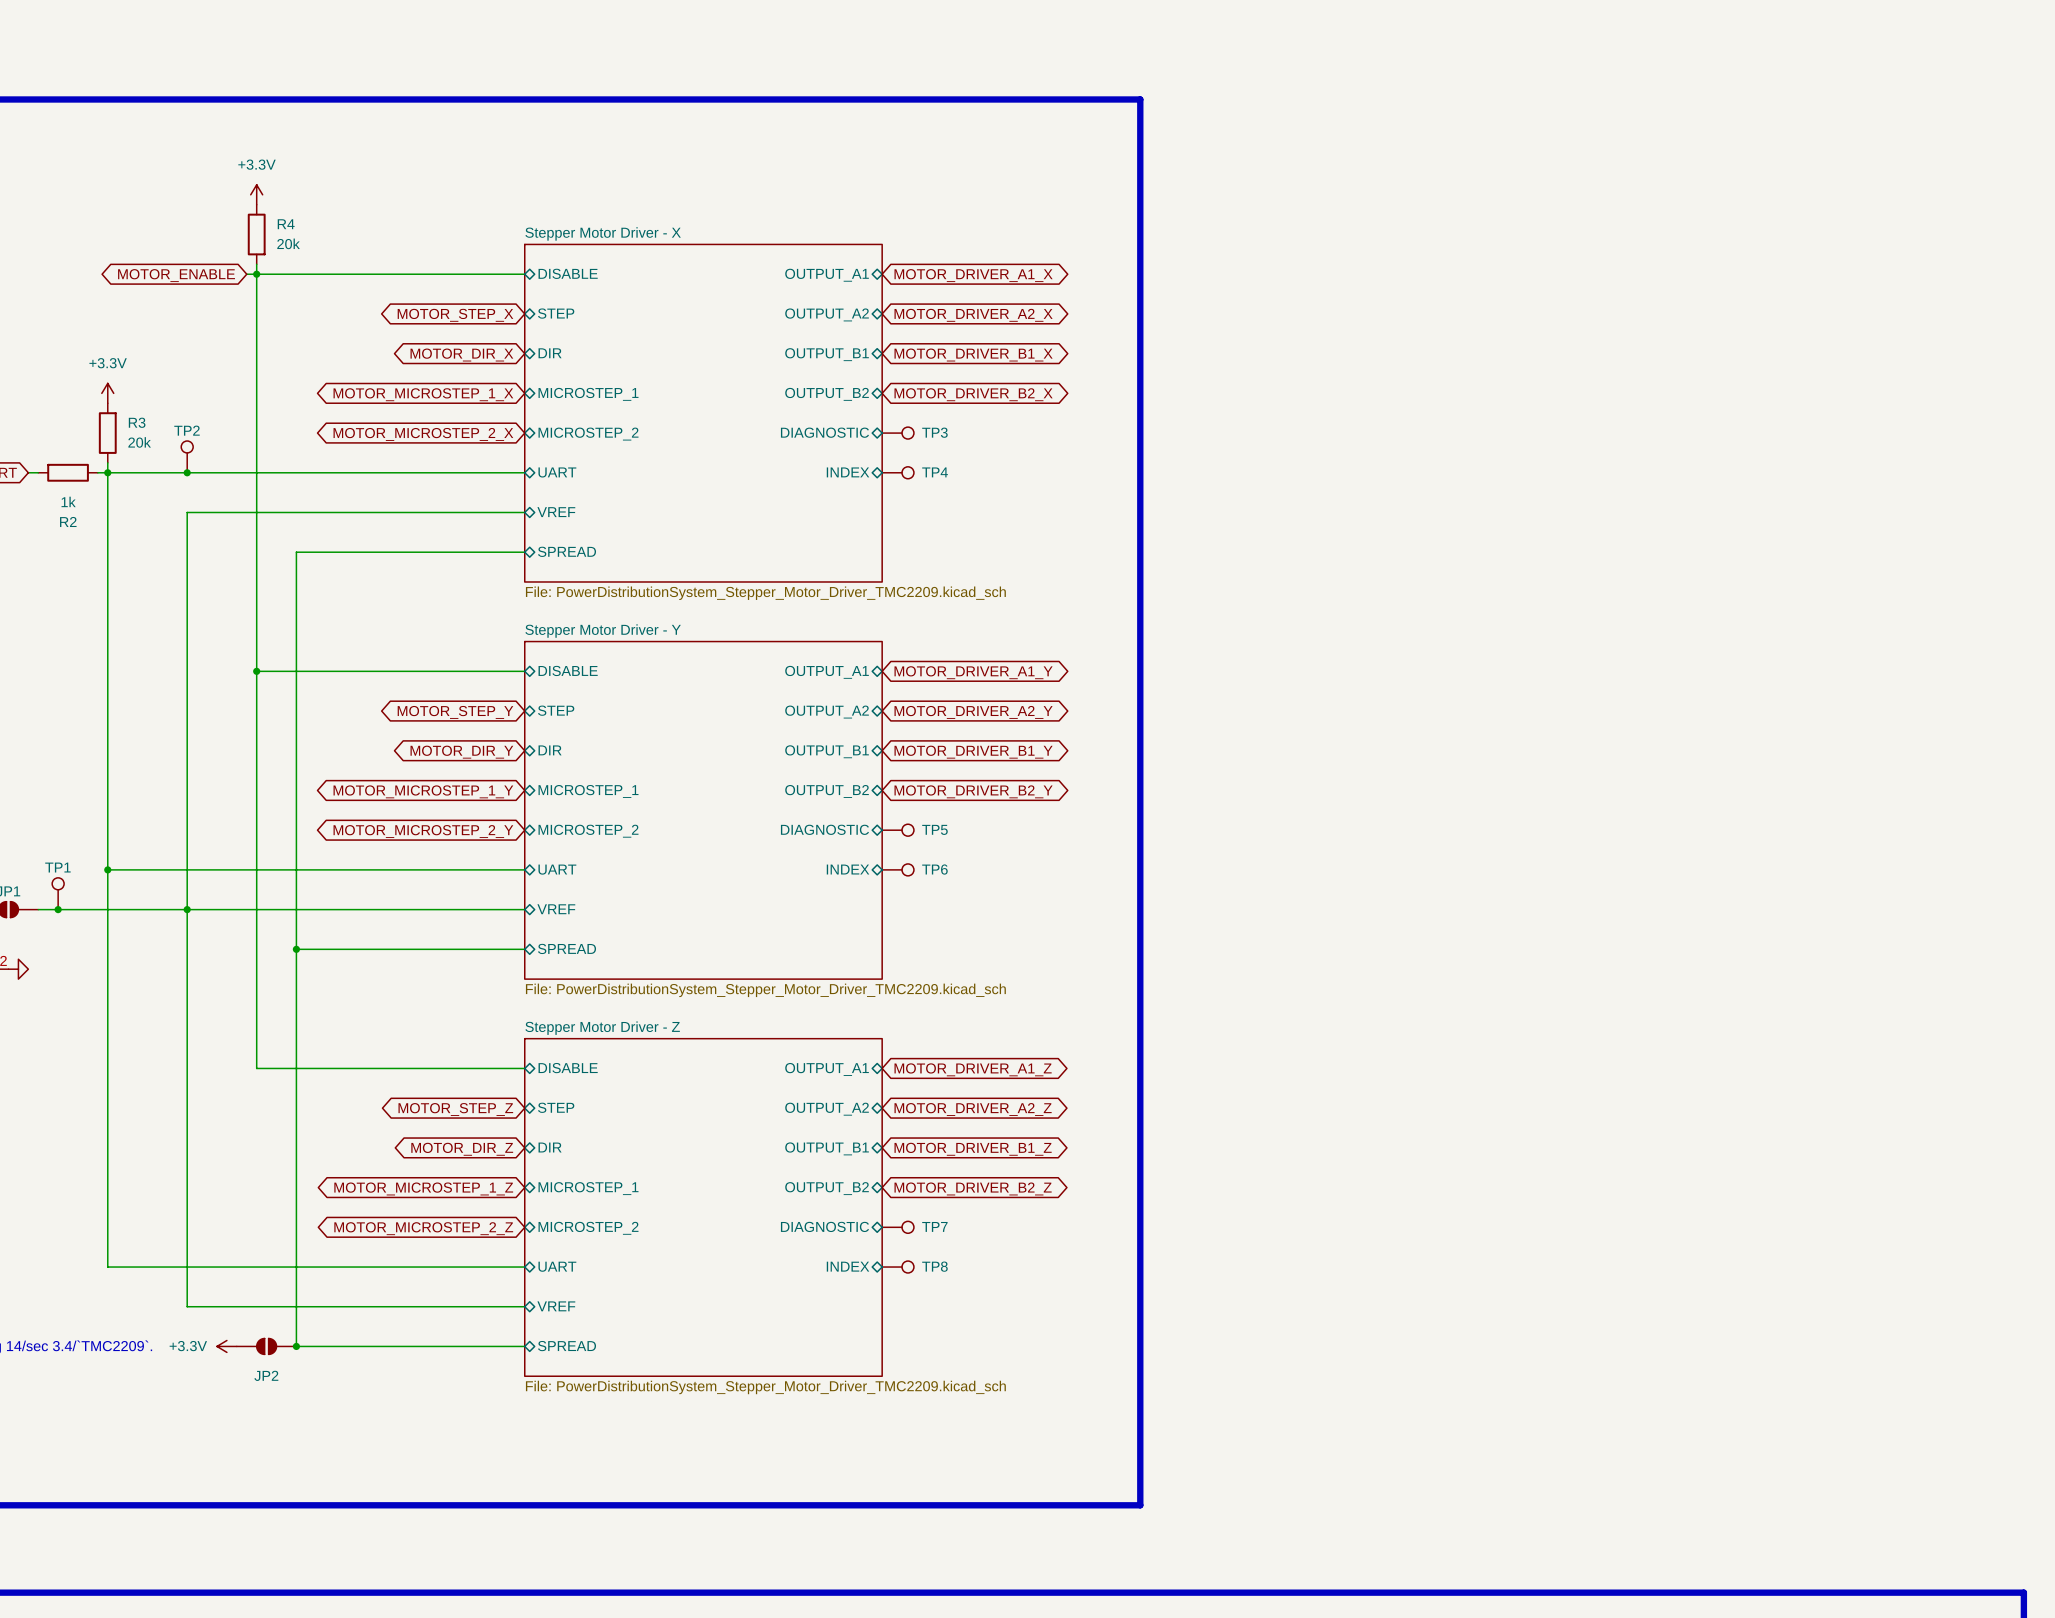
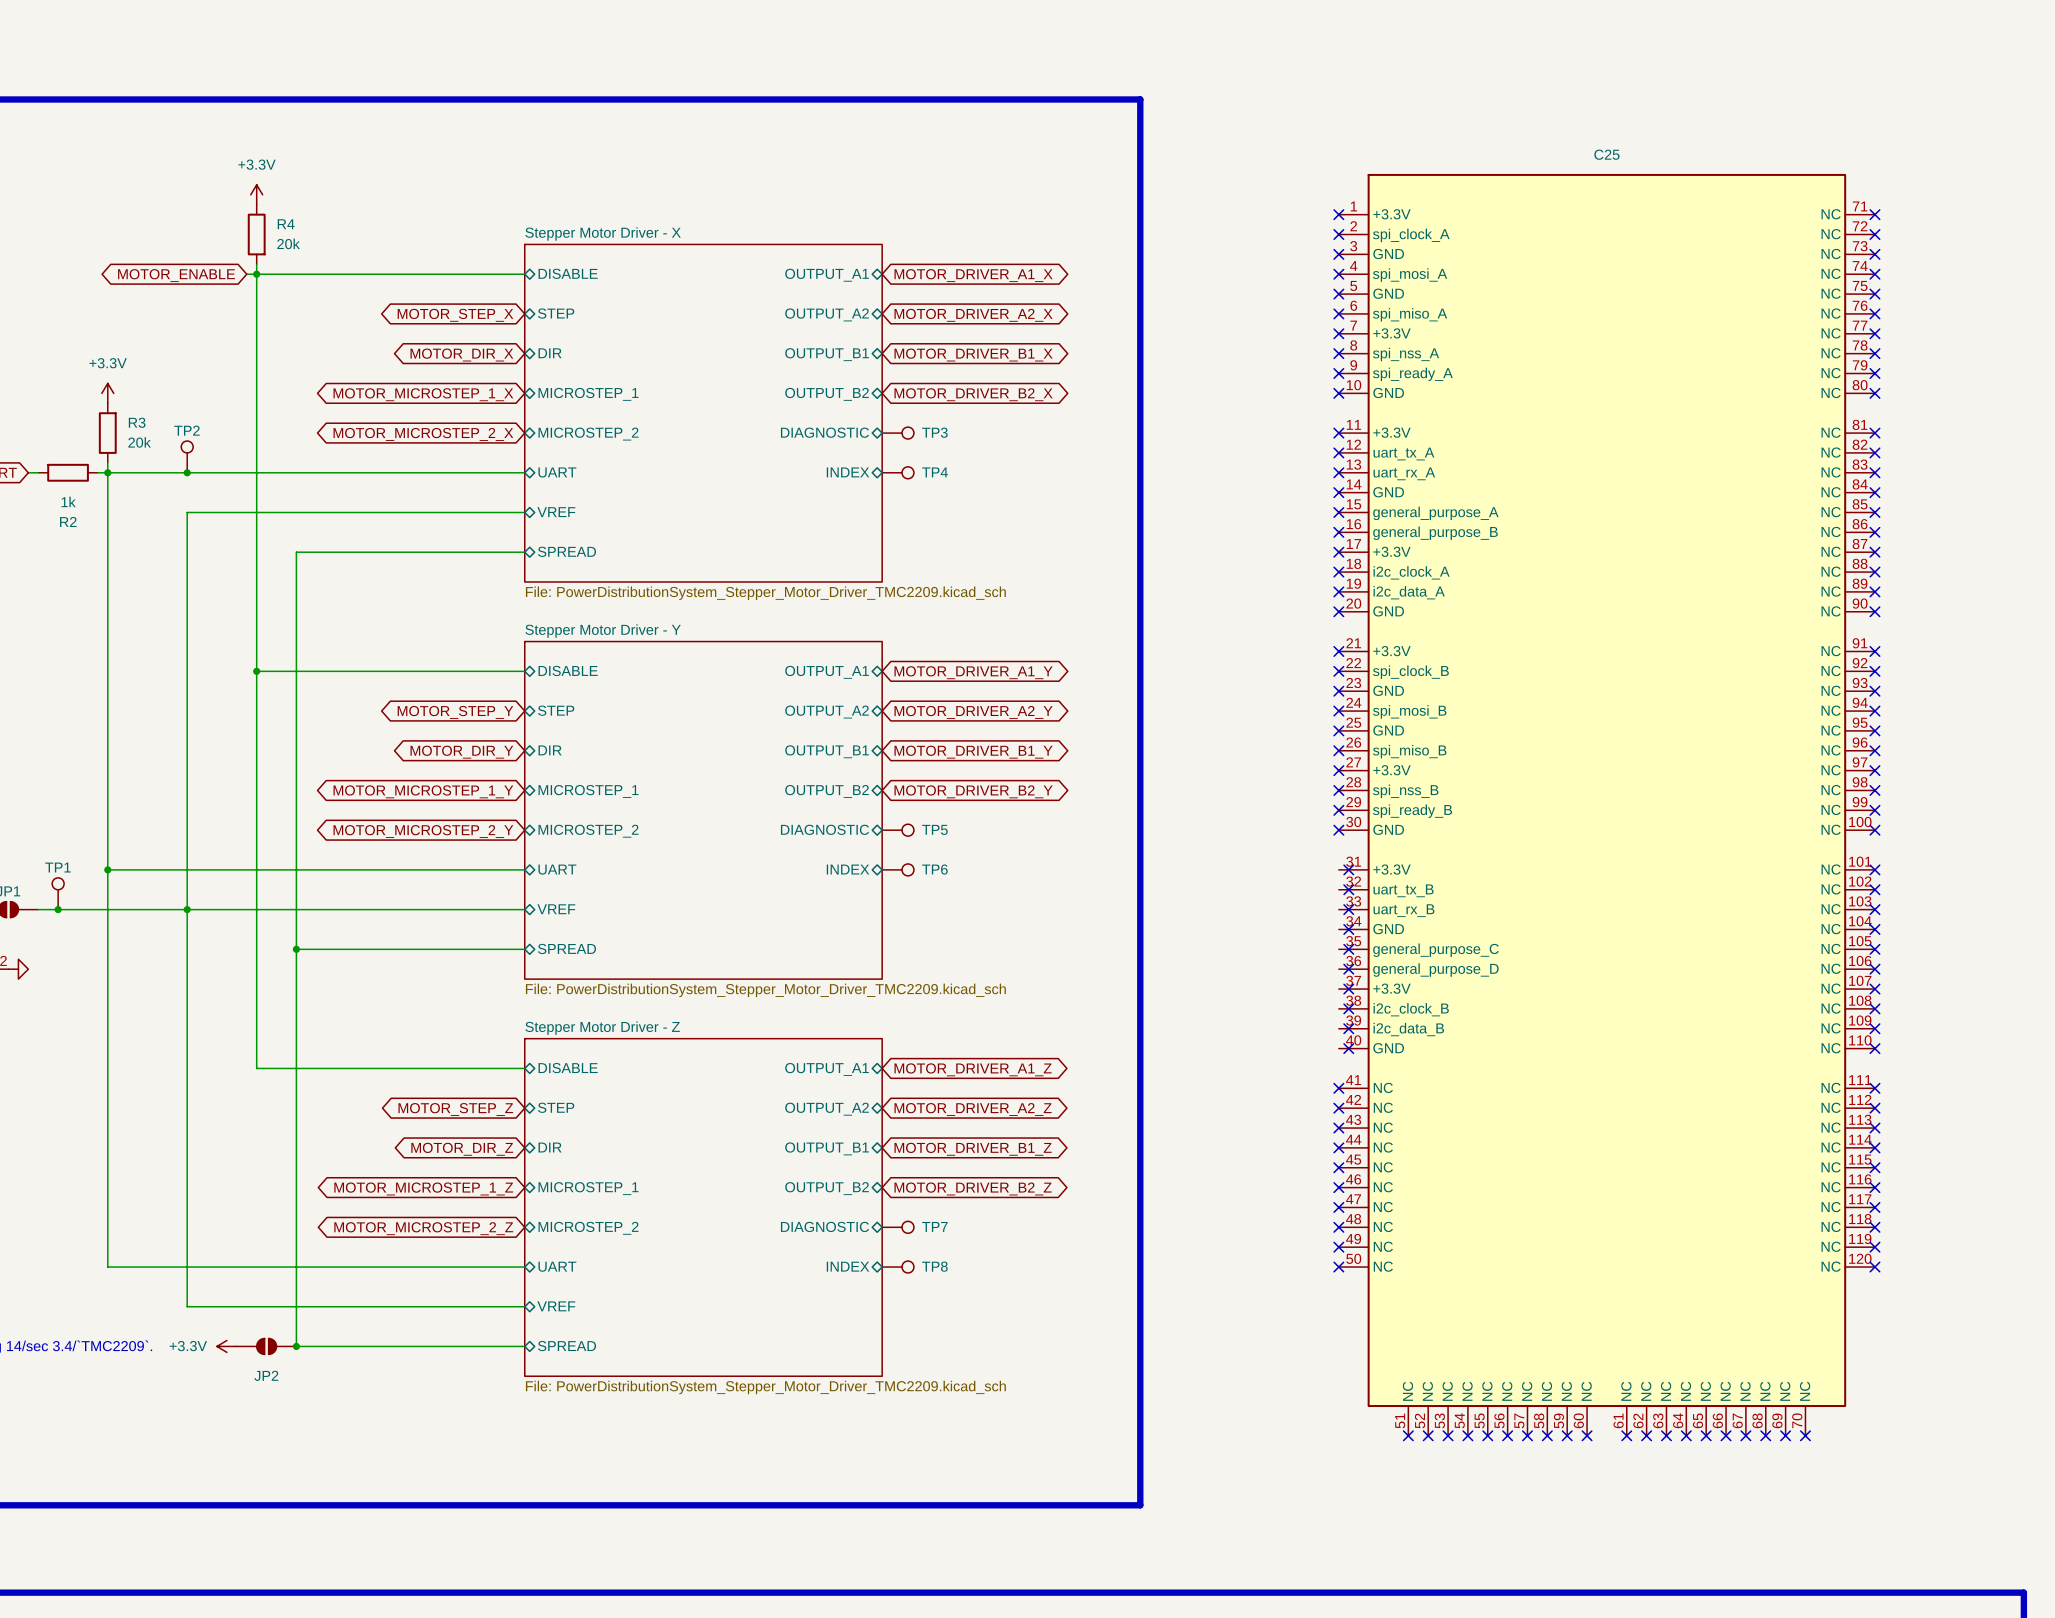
no-connect mark: none -> (1338, 214)
no-connect mark: none -> (1874, 214)
no-connect mark: none -> (1338, 234)
no-connect mark: none -> (1874, 234)
no-connect mark: none -> (1338, 254)
no-connect mark: none -> (1874, 254)
no-connect mark: none -> (1338, 274)
no-connect mark: none -> (1874, 274)
no-connect mark: none -> (1338, 294)
no-connect mark: none -> (1874, 294)
no-connect mark: none -> (1338, 313)
no-connect mark: none -> (1874, 313)
no-connect mark: none -> (1338, 333)
no-connect mark: none -> (1874, 333)
no-connect mark: none -> (1338, 353)
no-connect mark: none -> (1874, 353)
no-connect mark: none -> (1338, 373)
no-connect mark: none -> (1874, 373)
no-connect mark: none -> (1338, 393)
no-connect mark: none -> (1874, 393)
no-connect mark: none -> (1338, 433)
no-connect mark: none -> (1874, 433)
no-connect mark: none -> (1338, 452)
no-connect mark: none -> (1874, 452)
no-connect mark: none -> (1338, 472)
no-connect mark: none -> (1874, 472)
no-connect mark: none -> (1338, 492)
no-connect mark: none -> (1874, 492)
no-connect mark: none -> (1338, 512)
no-connect mark: none -> (1874, 512)
no-connect mark: none -> (1338, 532)
no-connect mark: none -> (1874, 532)
no-connect mark: none -> (1338, 552)
no-connect mark: none -> (1874, 552)
no-connect mark: none -> (1338, 572)
no-connect mark: none -> (1874, 572)
no-connect mark: none -> (1338, 591)
no-connect mark: none -> (1874, 591)
no-connect mark: none -> (1338, 611)
no-connect mark: none -> (1874, 611)
no-connect mark: none -> (1338, 651)
no-connect mark: none -> (1874, 651)
no-connect mark: none -> (1338, 671)
no-connect mark: none -> (1874, 671)
no-connect mark: none -> (1338, 691)
no-connect mark: none -> (1874, 691)
no-connect mark: none -> (1338, 711)
no-connect mark: none -> (1874, 711)
no-connect mark: none -> (1338, 730)
no-connect mark: none -> (1874, 730)
no-connect mark: none -> (1338, 750)
no-connect mark: none -> (1874, 750)
no-connect mark: none -> (1338, 770)
no-connect mark: none -> (1874, 770)
no-connect mark: none -> (1338, 790)
no-connect mark: none -> (1874, 790)
C25: none -> (1606, 804)
no-connect mark: none -> (1338, 810)
no-connect mark: none -> (1874, 810)
no-connect mark: none -> (1338, 830)
no-connect mark: none -> (1874, 830)
no-connect mark: none -> (1348, 869)
no-connect mark: none -> (1874, 869)
no-connect mark: none -> (1348, 889)
no-connect mark: none -> (1874, 889)
no-connect mark: none -> (1348, 909)
no-connect mark: none -> (1874, 909)
no-connect mark: none -> (1348, 929)
no-connect mark: none -> (1874, 929)
no-connect mark: none -> (1348, 949)
no-connect mark: none -> (1874, 949)
no-connect mark: none -> (1348, 969)
no-connect mark: none -> (1874, 969)
no-connect mark: none -> (1348, 989)
no-connect mark: none -> (1874, 989)
no-connect mark: none -> (1348, 1008)
no-connect mark: none -> (1874, 1008)
no-connect mark: none -> (1348, 1028)
no-connect mark: none -> (1874, 1028)
no-connect mark: none -> (1348, 1048)
no-connect mark: none -> (1874, 1048)
no-connect mark: none -> (1338, 1088)
no-connect mark: none -> (1874, 1088)
no-connect mark: none -> (1338, 1108)
no-connect mark: none -> (1874, 1108)
no-connect mark: none -> (1338, 1128)
no-connect mark: none -> (1874, 1128)
no-connect mark: none -> (1338, 1147)
no-connect mark: none -> (1874, 1147)
no-connect mark: none -> (1338, 1167)
no-connect mark: none -> (1874, 1167)
no-connect mark: none -> (1338, 1187)
no-connect mark: none -> (1874, 1187)
no-connect mark: none -> (1338, 1207)
no-connect mark: none -> (1874, 1207)
no-connect mark: none -> (1338, 1227)
no-connect mark: none -> (1874, 1227)
no-connect mark: none -> (1338, 1247)
no-connect mark: none -> (1874, 1247)
no-connect mark: none -> (1338, 1267)
no-connect mark: none -> (1874, 1267)
no-connect mark: none -> (1408, 1435)
no-connect mark: none -> (1428, 1435)
no-connect mark: none -> (1448, 1435)
no-connect mark: none -> (1467, 1435)
no-connect mark: none -> (1487, 1435)
no-connect mark: none -> (1507, 1435)
no-connect mark: none -> (1527, 1435)
no-connect mark: none -> (1547, 1435)
no-connect mark: none -> (1567, 1435)
no-connect mark: none -> (1587, 1435)
no-connect mark: none -> (1626, 1435)
no-connect mark: none -> (1646, 1435)
no-connect mark: none -> (1666, 1435)
no-connect mark: none -> (1686, 1435)
no-connect mark: none -> (1706, 1435)
no-connect mark: none -> (1726, 1435)
no-connect mark: none -> (1745, 1435)
no-connect mark: none -> (1765, 1435)
no-connect mark: none -> (1785, 1435)
no-connect mark: none -> (1805, 1435)

